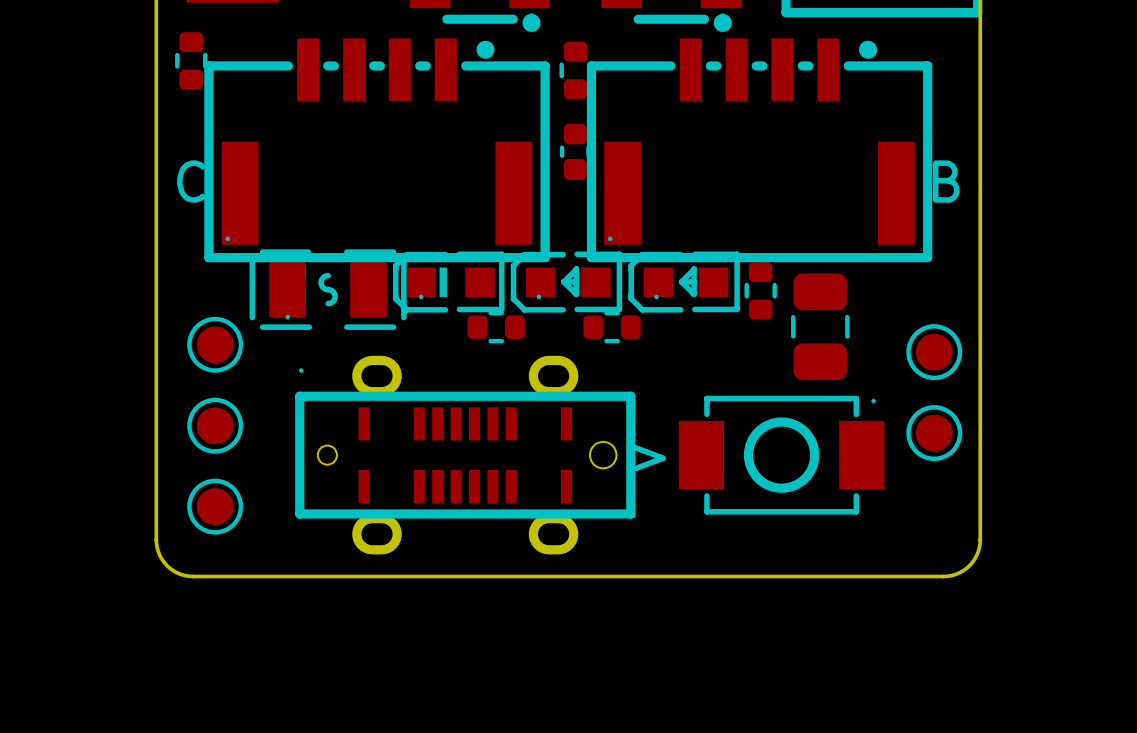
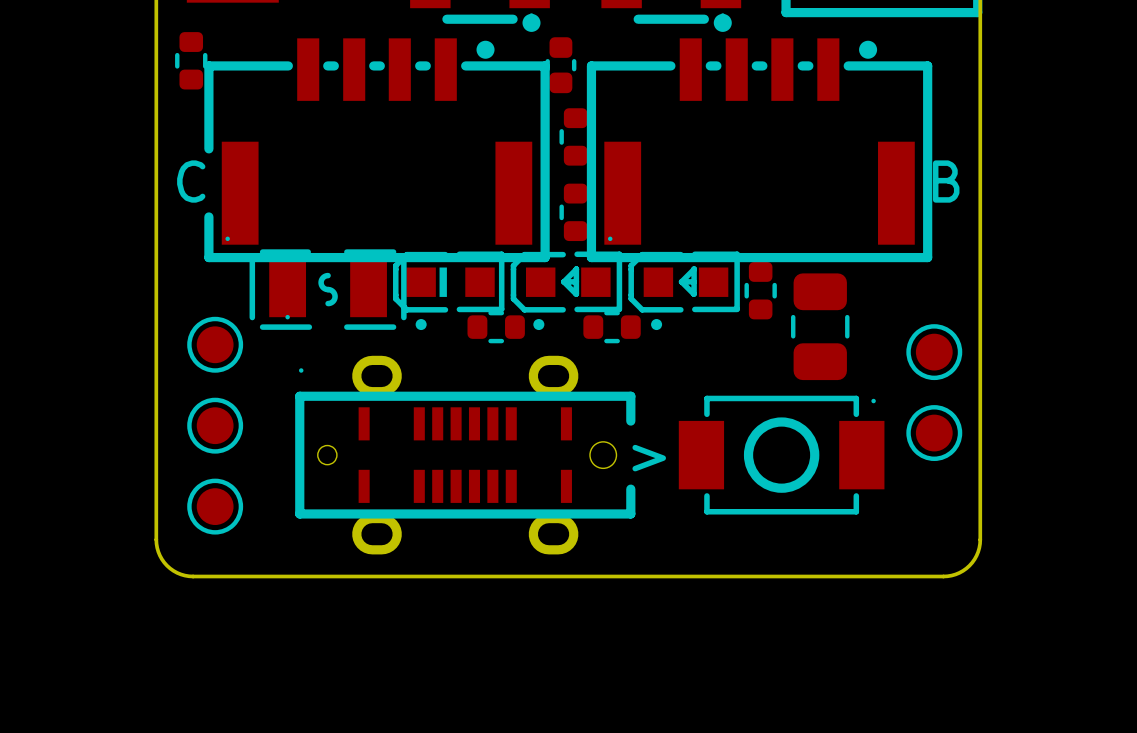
part footprint: [204, 38, 550, 263] -> [204, 38, 550, 263]
part footprint: [559, 41, 592, 100] -> [545, 37, 577, 94]
part footprint: [559, 123, 591, 180] -> [559, 108, 592, 166]
part: none -> (575, 212)
part footprint: [393, 251, 505, 313] -> [393, 251, 505, 331]
part footprint: [510, 251, 623, 313] -> [510, 251, 623, 331]
part footprint: [628, 251, 740, 313] -> [628, 251, 740, 331]
part footprint: [295, 355, 636, 555] -> [295, 355, 636, 555]

